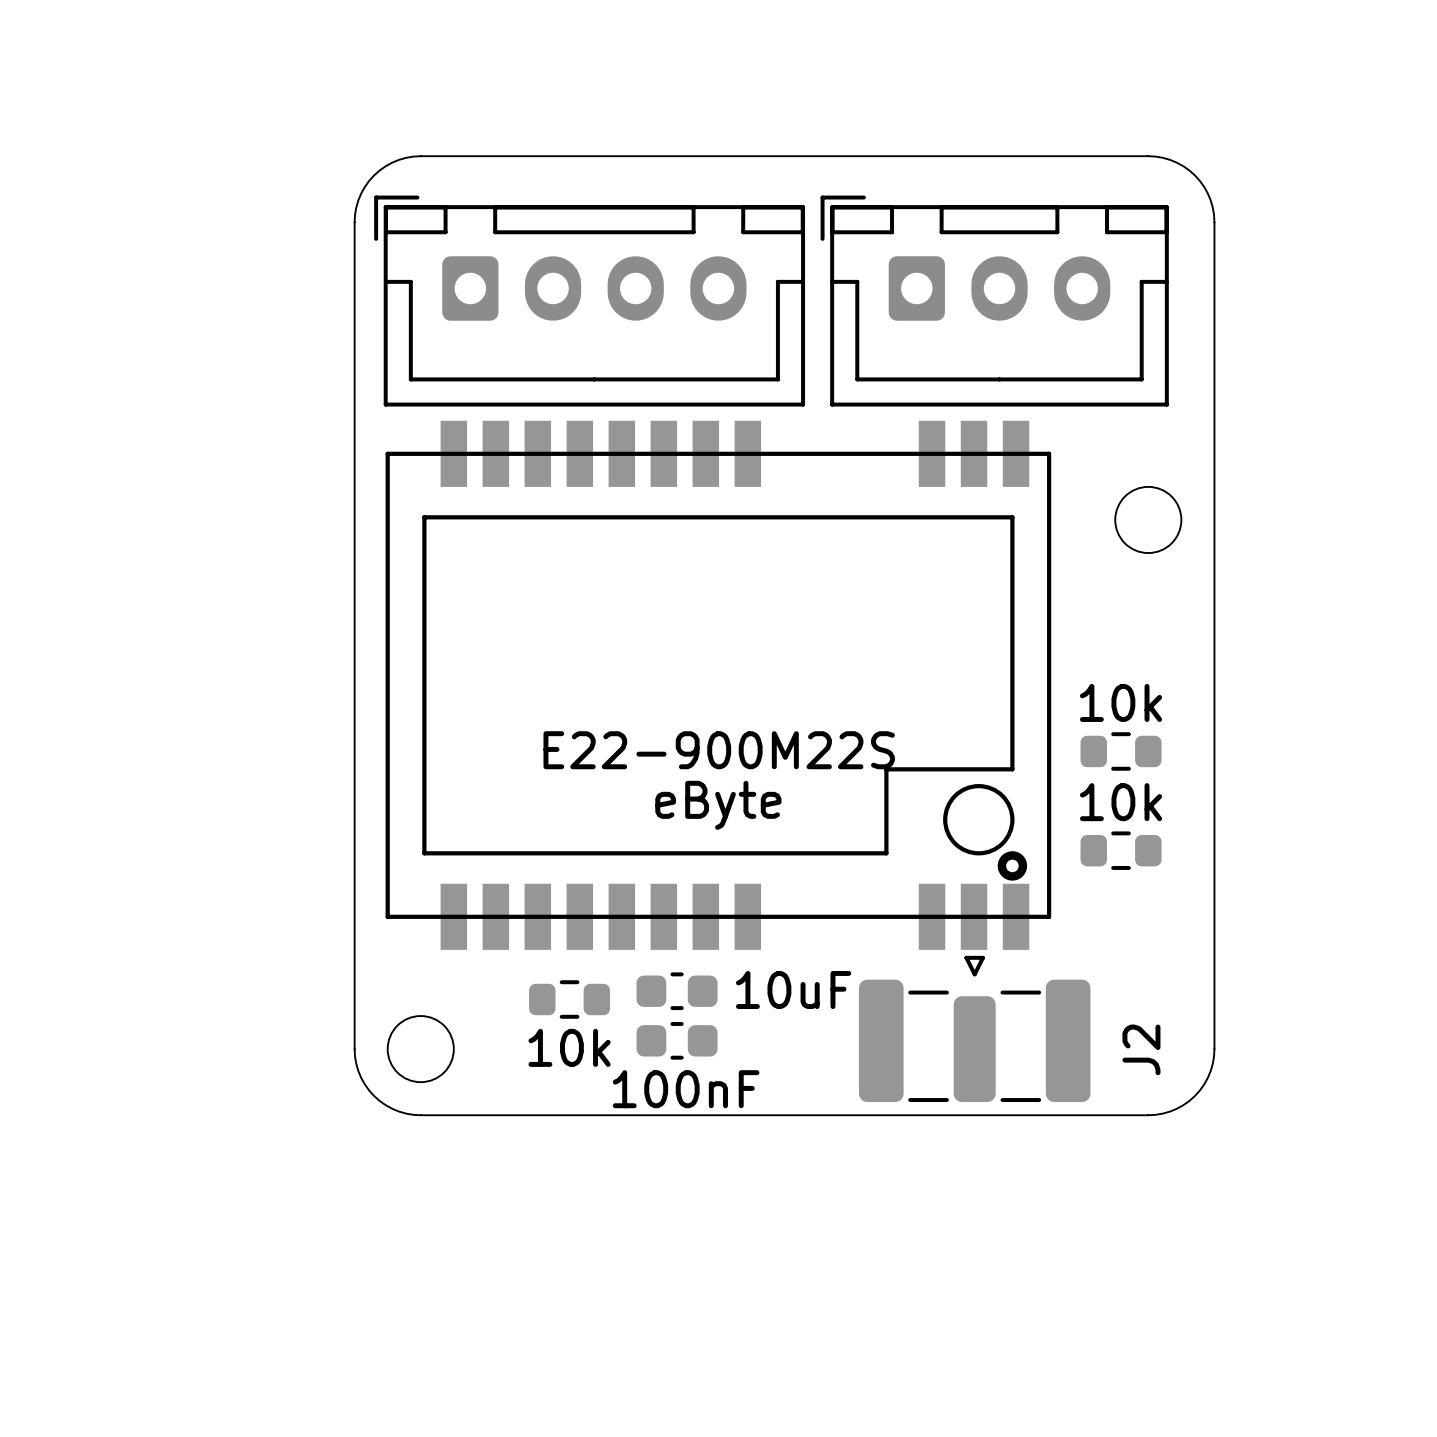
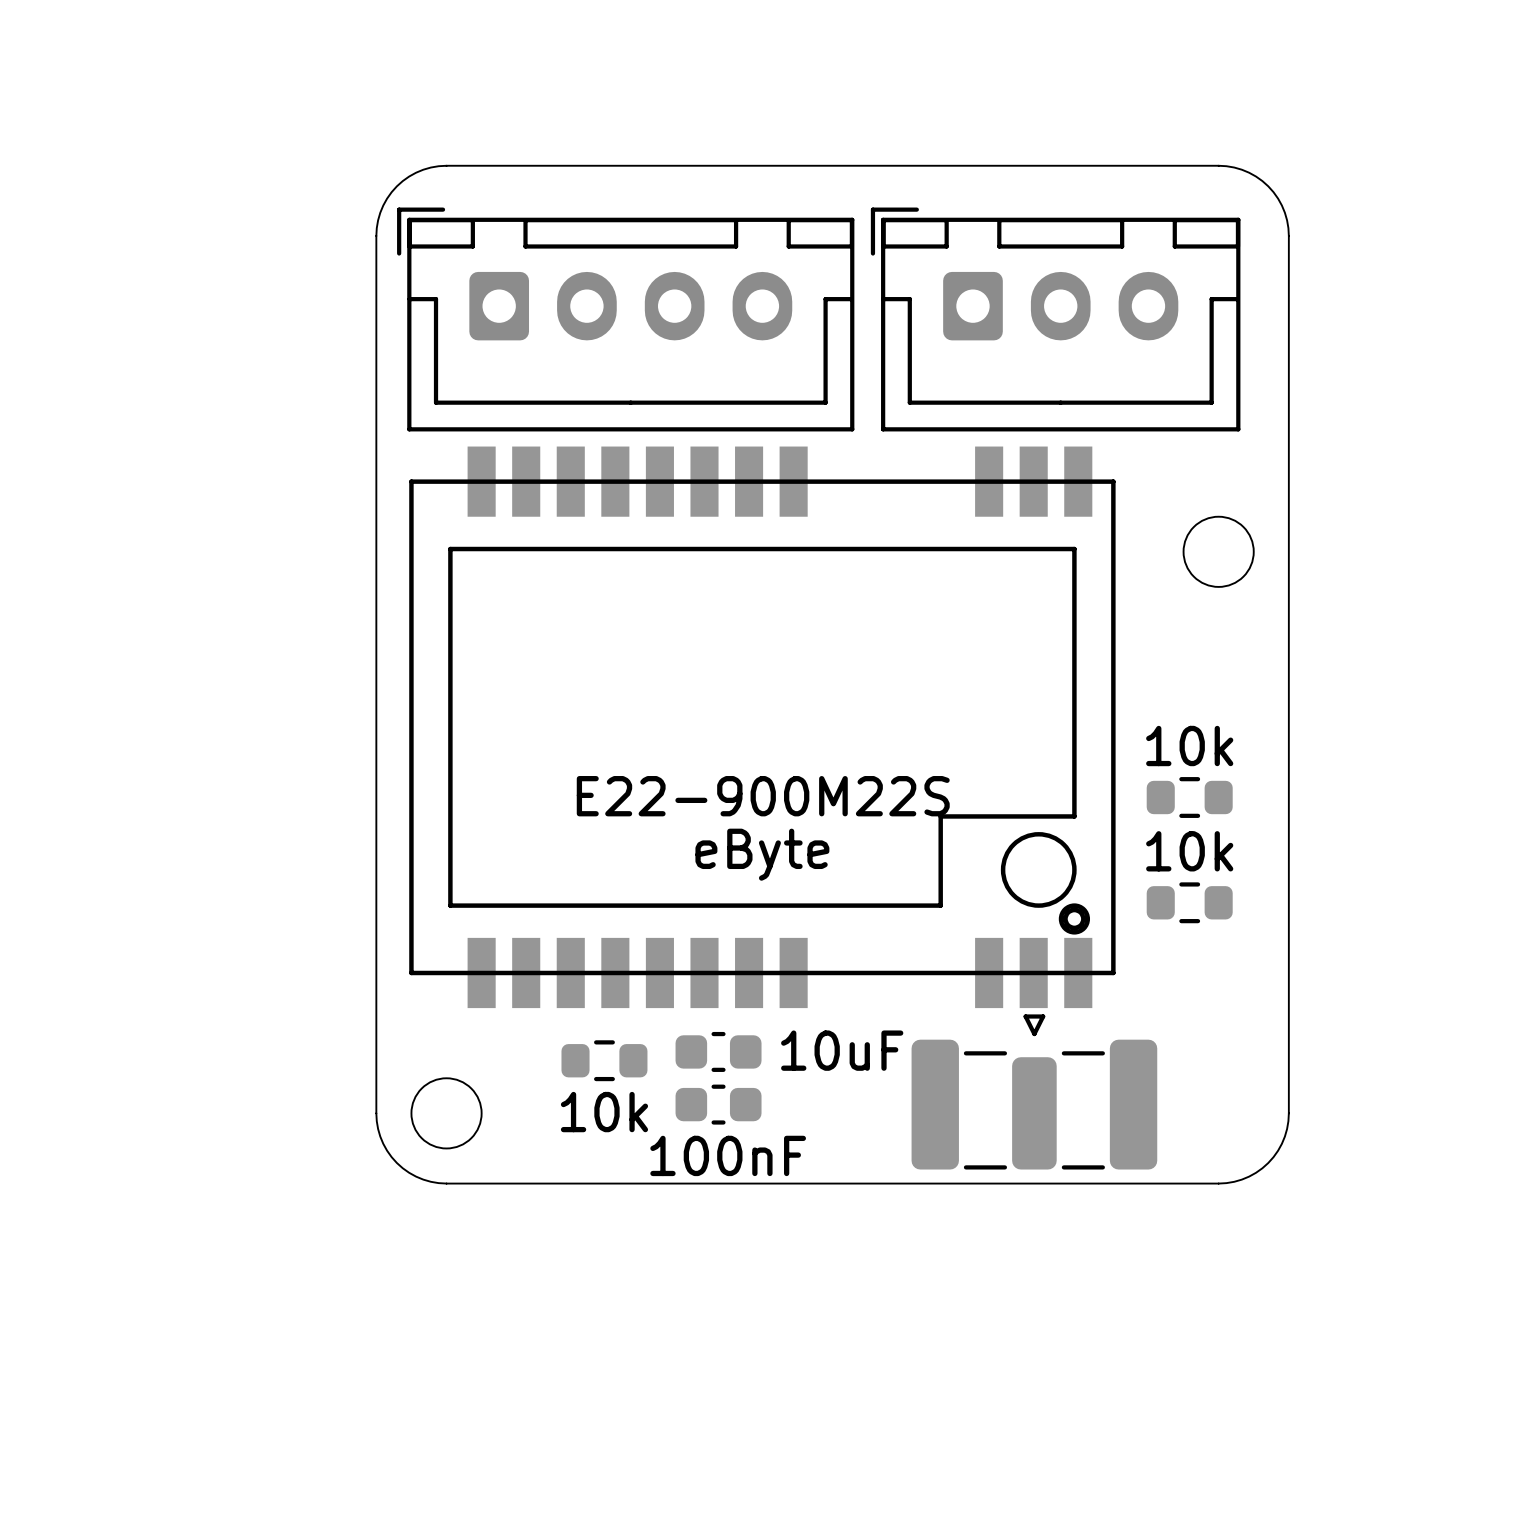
J2 name: J2 (1141, 1049) -> none

